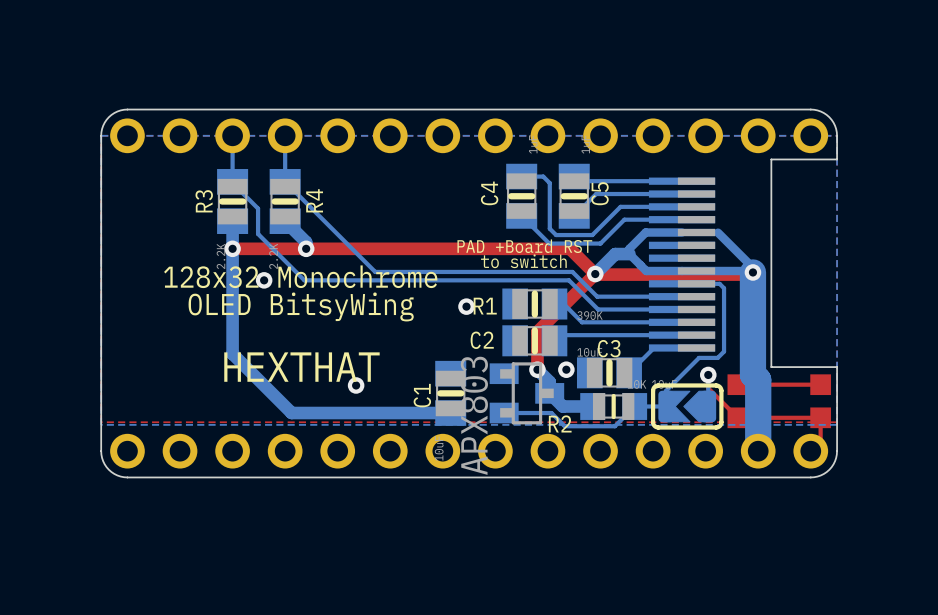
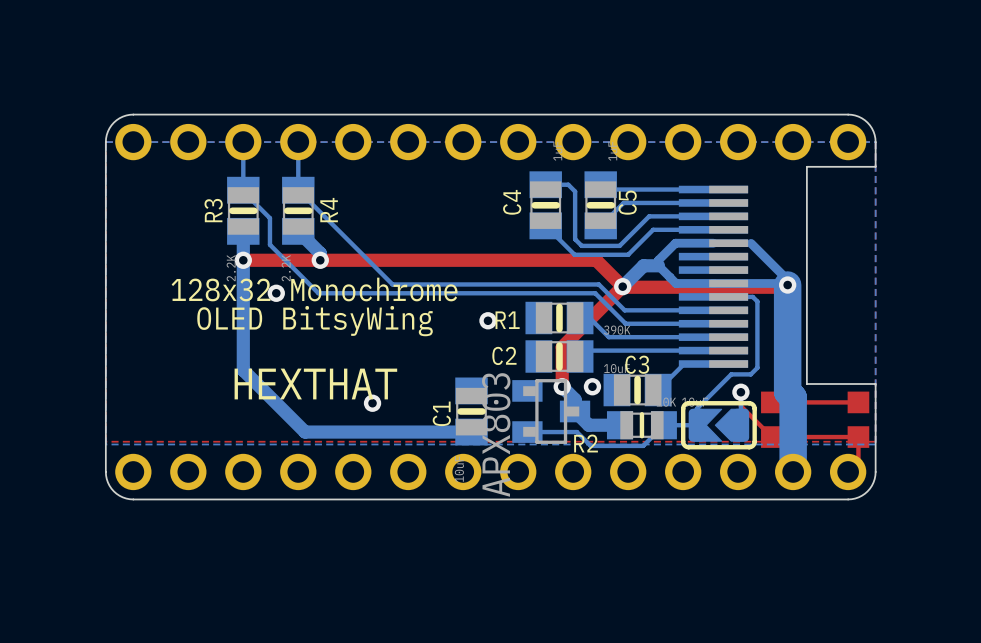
text: PAD +Board RST (524, 246) -> none
text: to switch (523, 261) -> none

